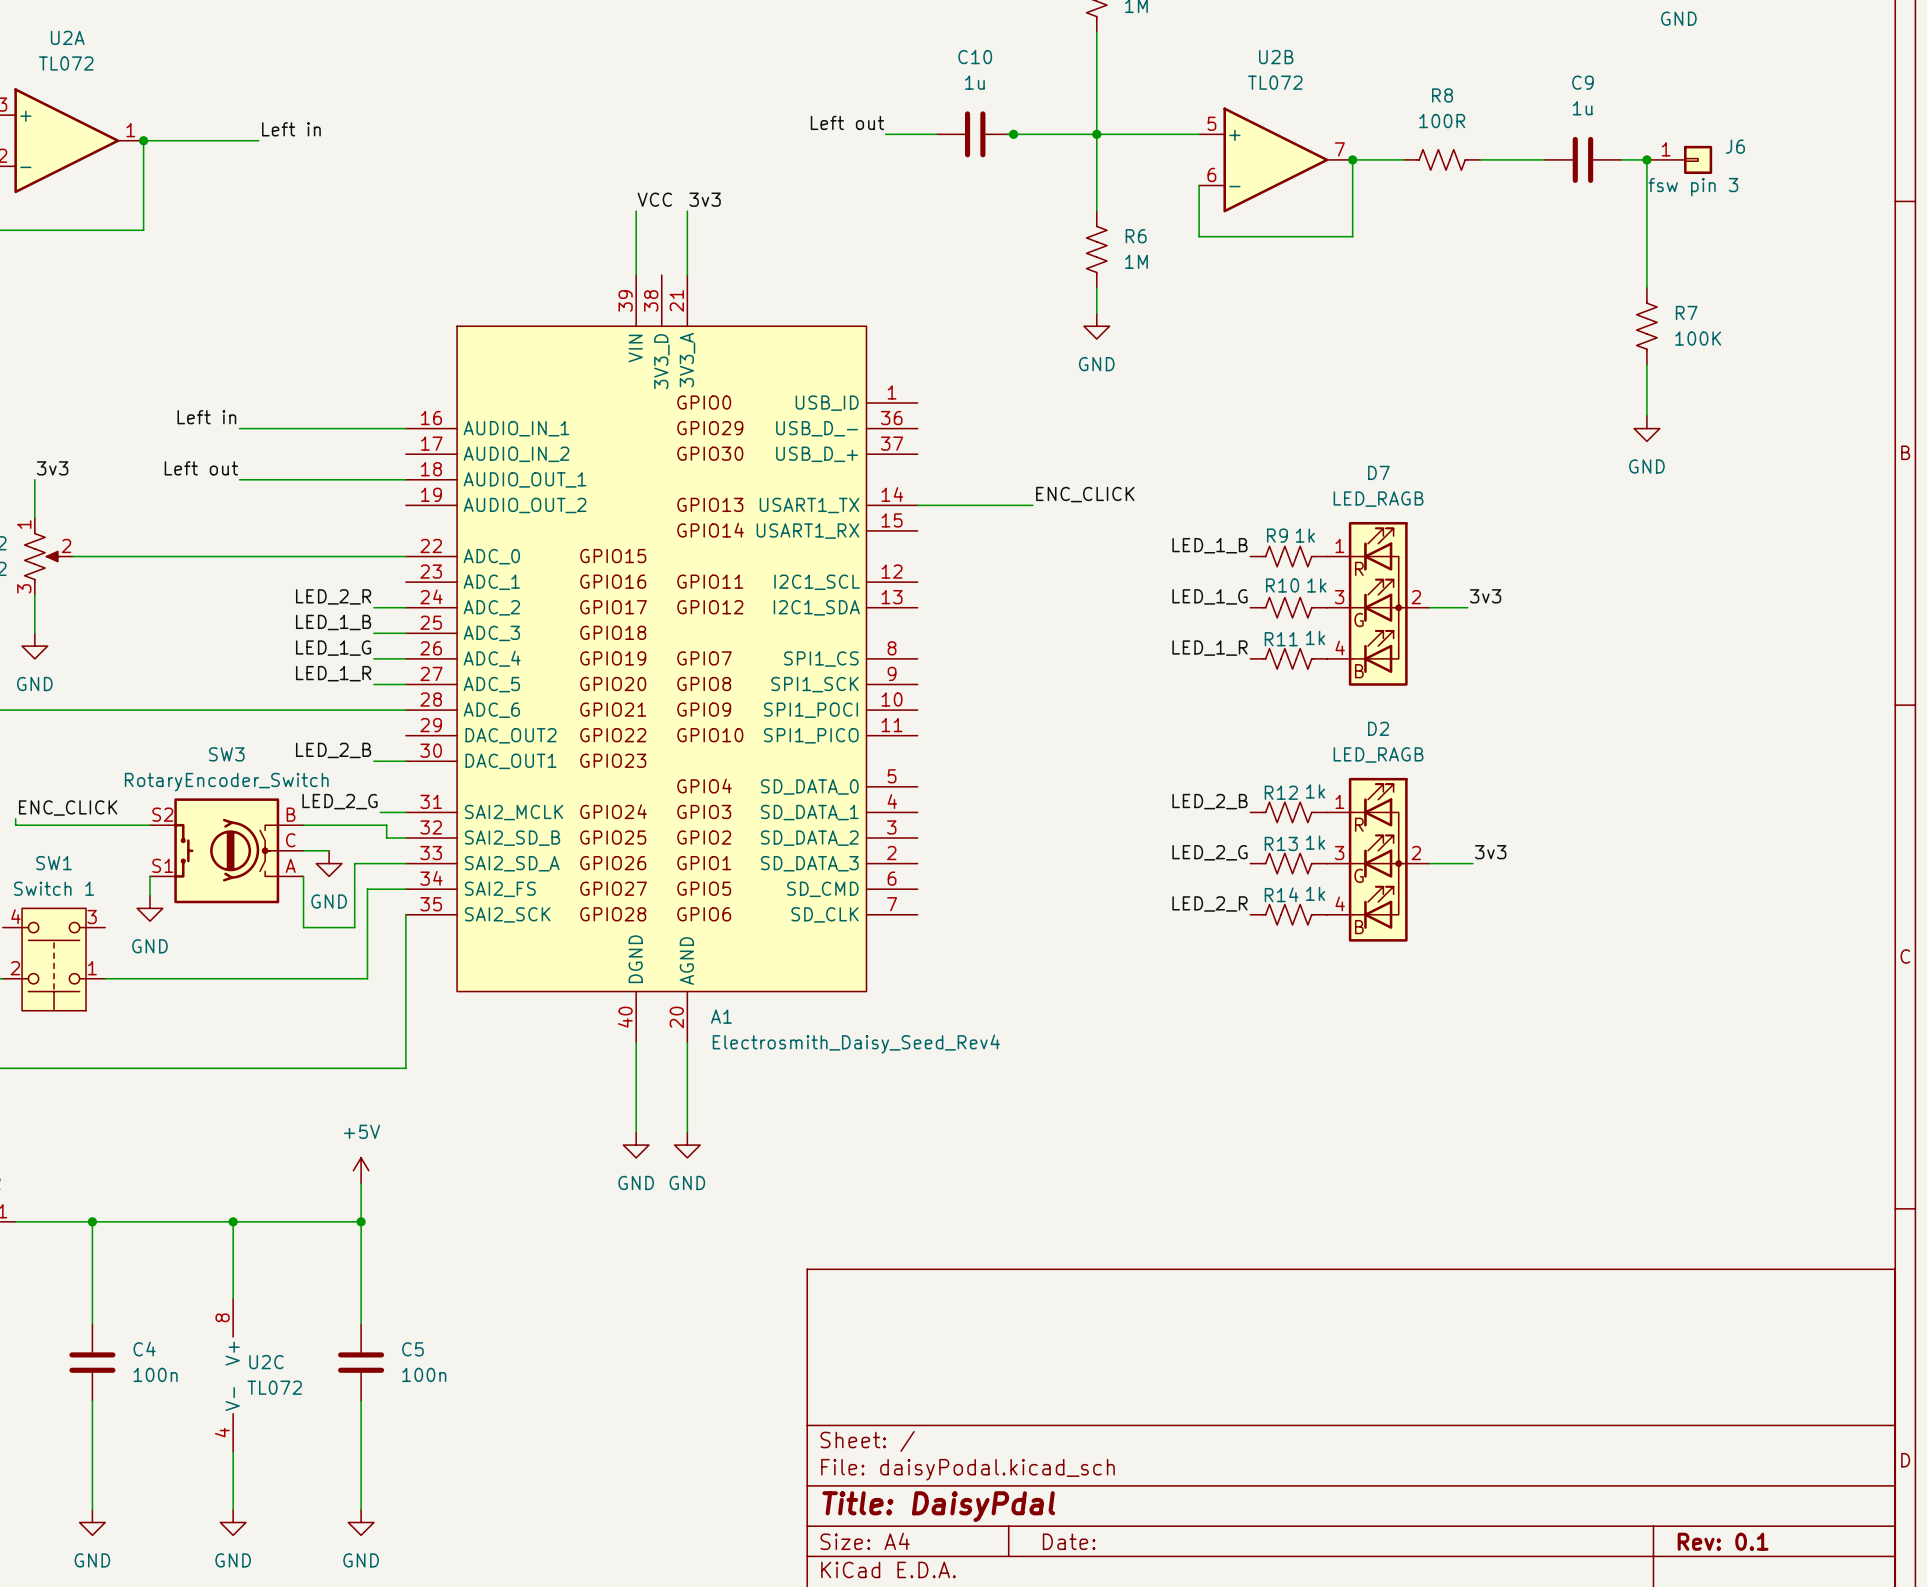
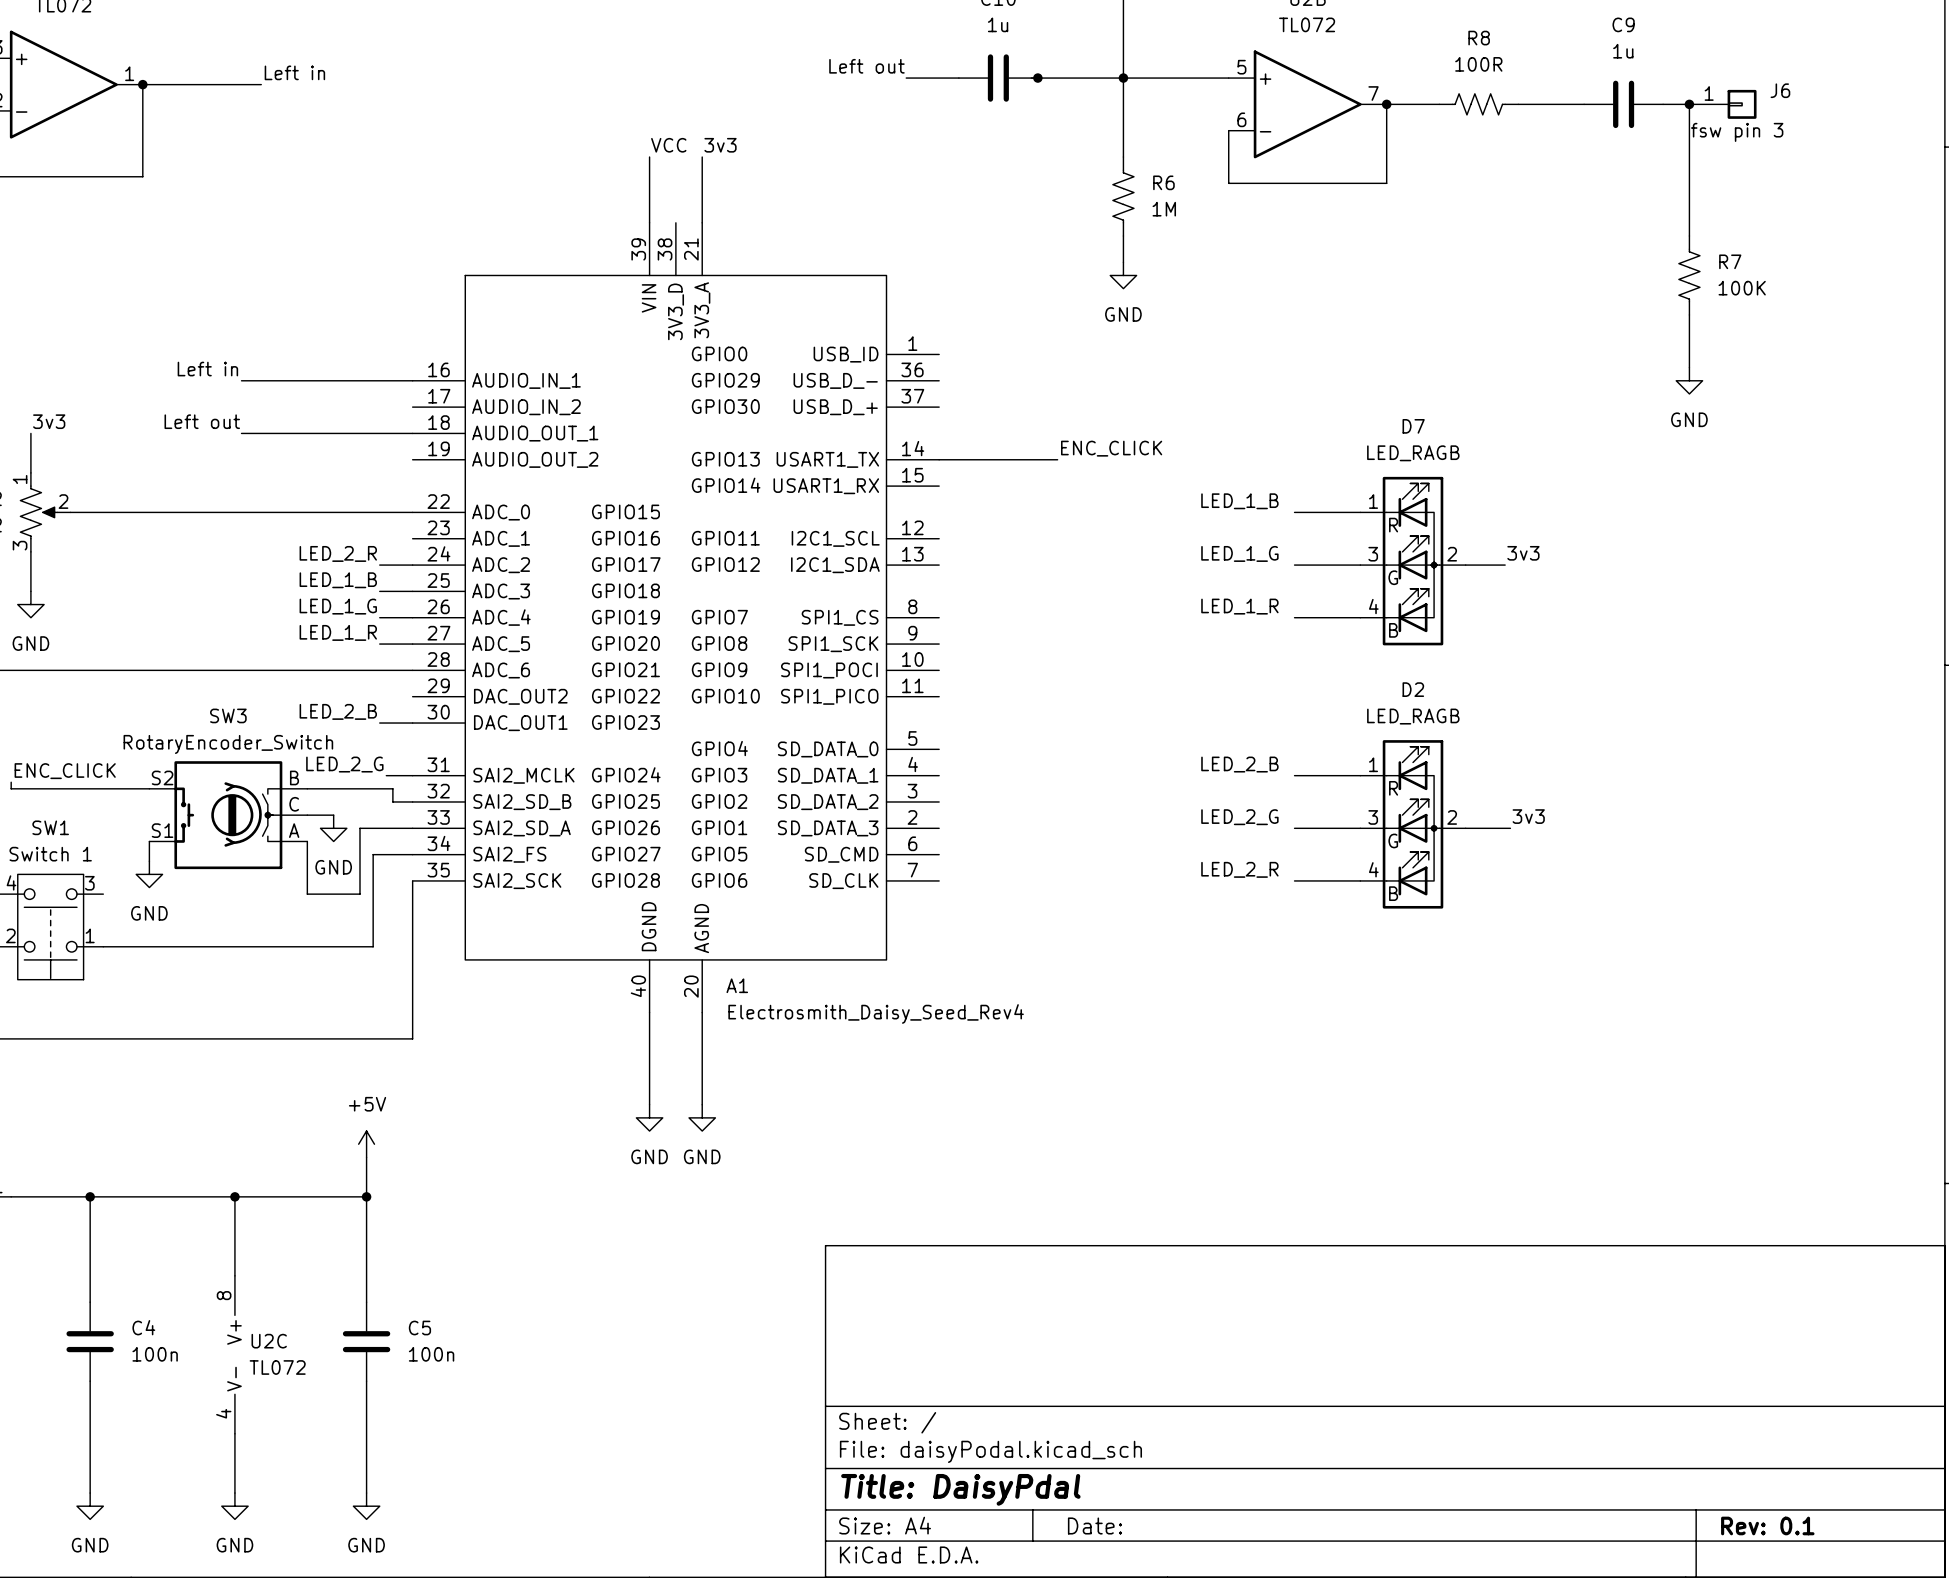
wire: none -> (1294, 512) (1360, 512)
R9: 1k (1288, 556) -> none
wire: none -> (1294, 565) (1360, 565)
R10: 1k (1288, 607) -> none
wire: none -> (1294, 617) (1360, 617)
R11: 1k (1288, 658) -> none
wire: none -> (1294, 775) (1360, 775)
R12: 1k (1288, 812) -> none
wire: none -> (1294, 828) (1360, 828)
R13: 1k (1288, 863) -> none
wire: none -> (1294, 880) (1360, 880)
R14: 1k (1288, 914) -> none

